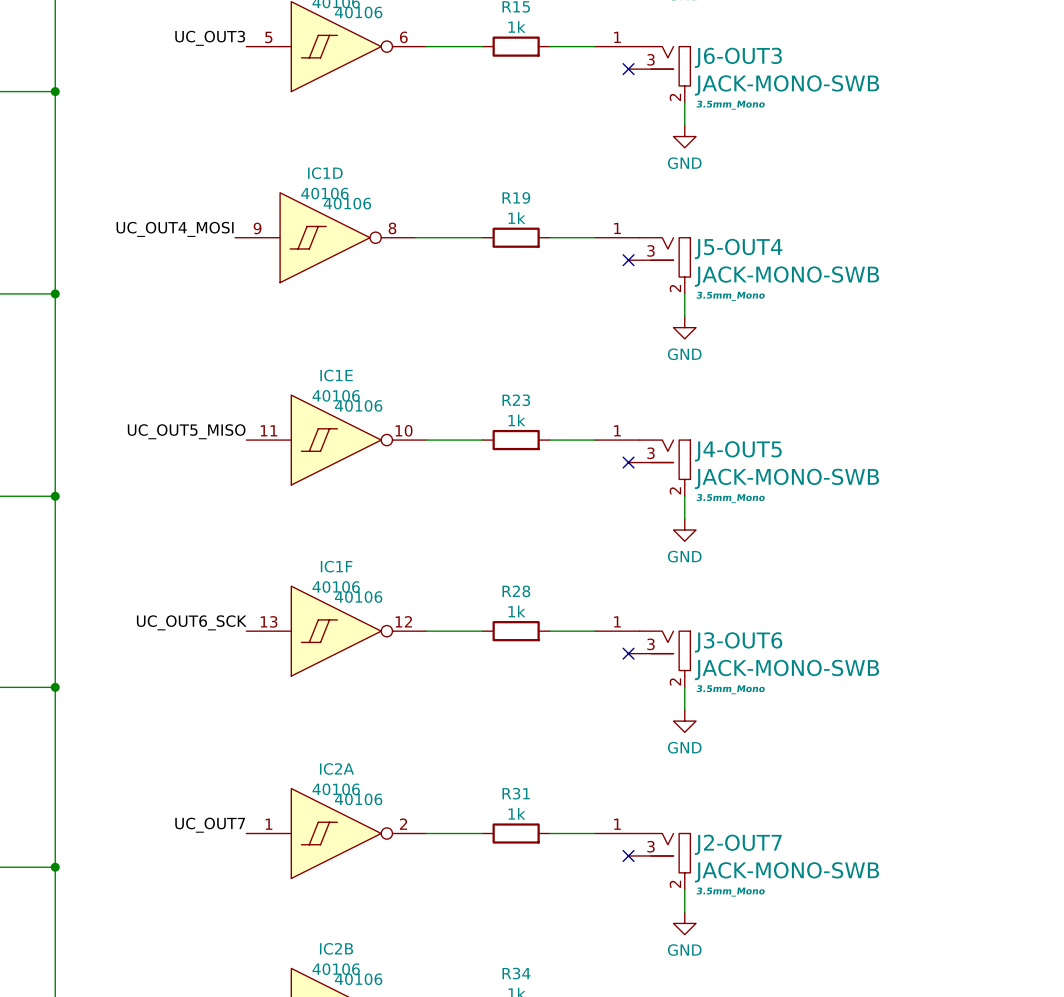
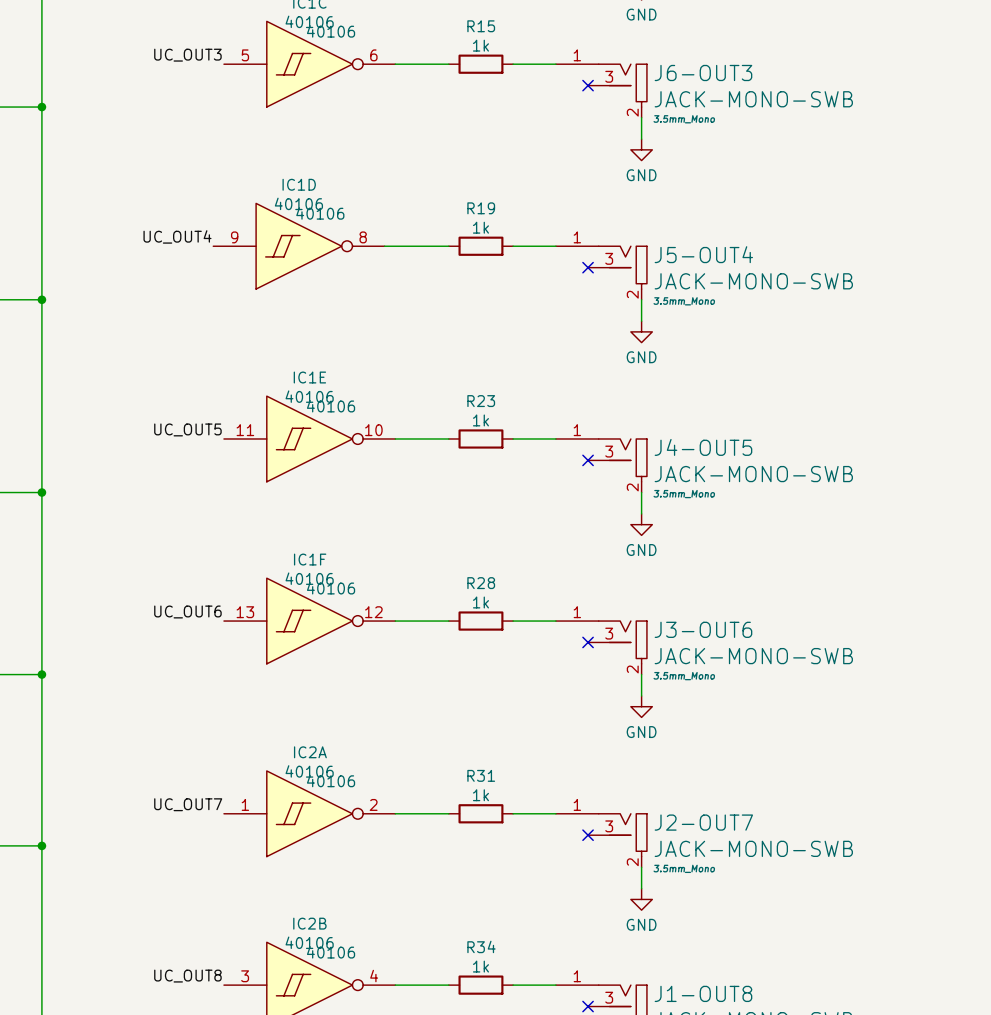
label: UC_OUT4_MOSI (175, 229) -> UC_OUT4 (177, 236)
label: UC_OUT5_MISO (186, 431) -> UC_OUT5 (187, 429)
label: UC_OUT6_SCK (191, 622) -> UC_OUT6 (187, 611)

